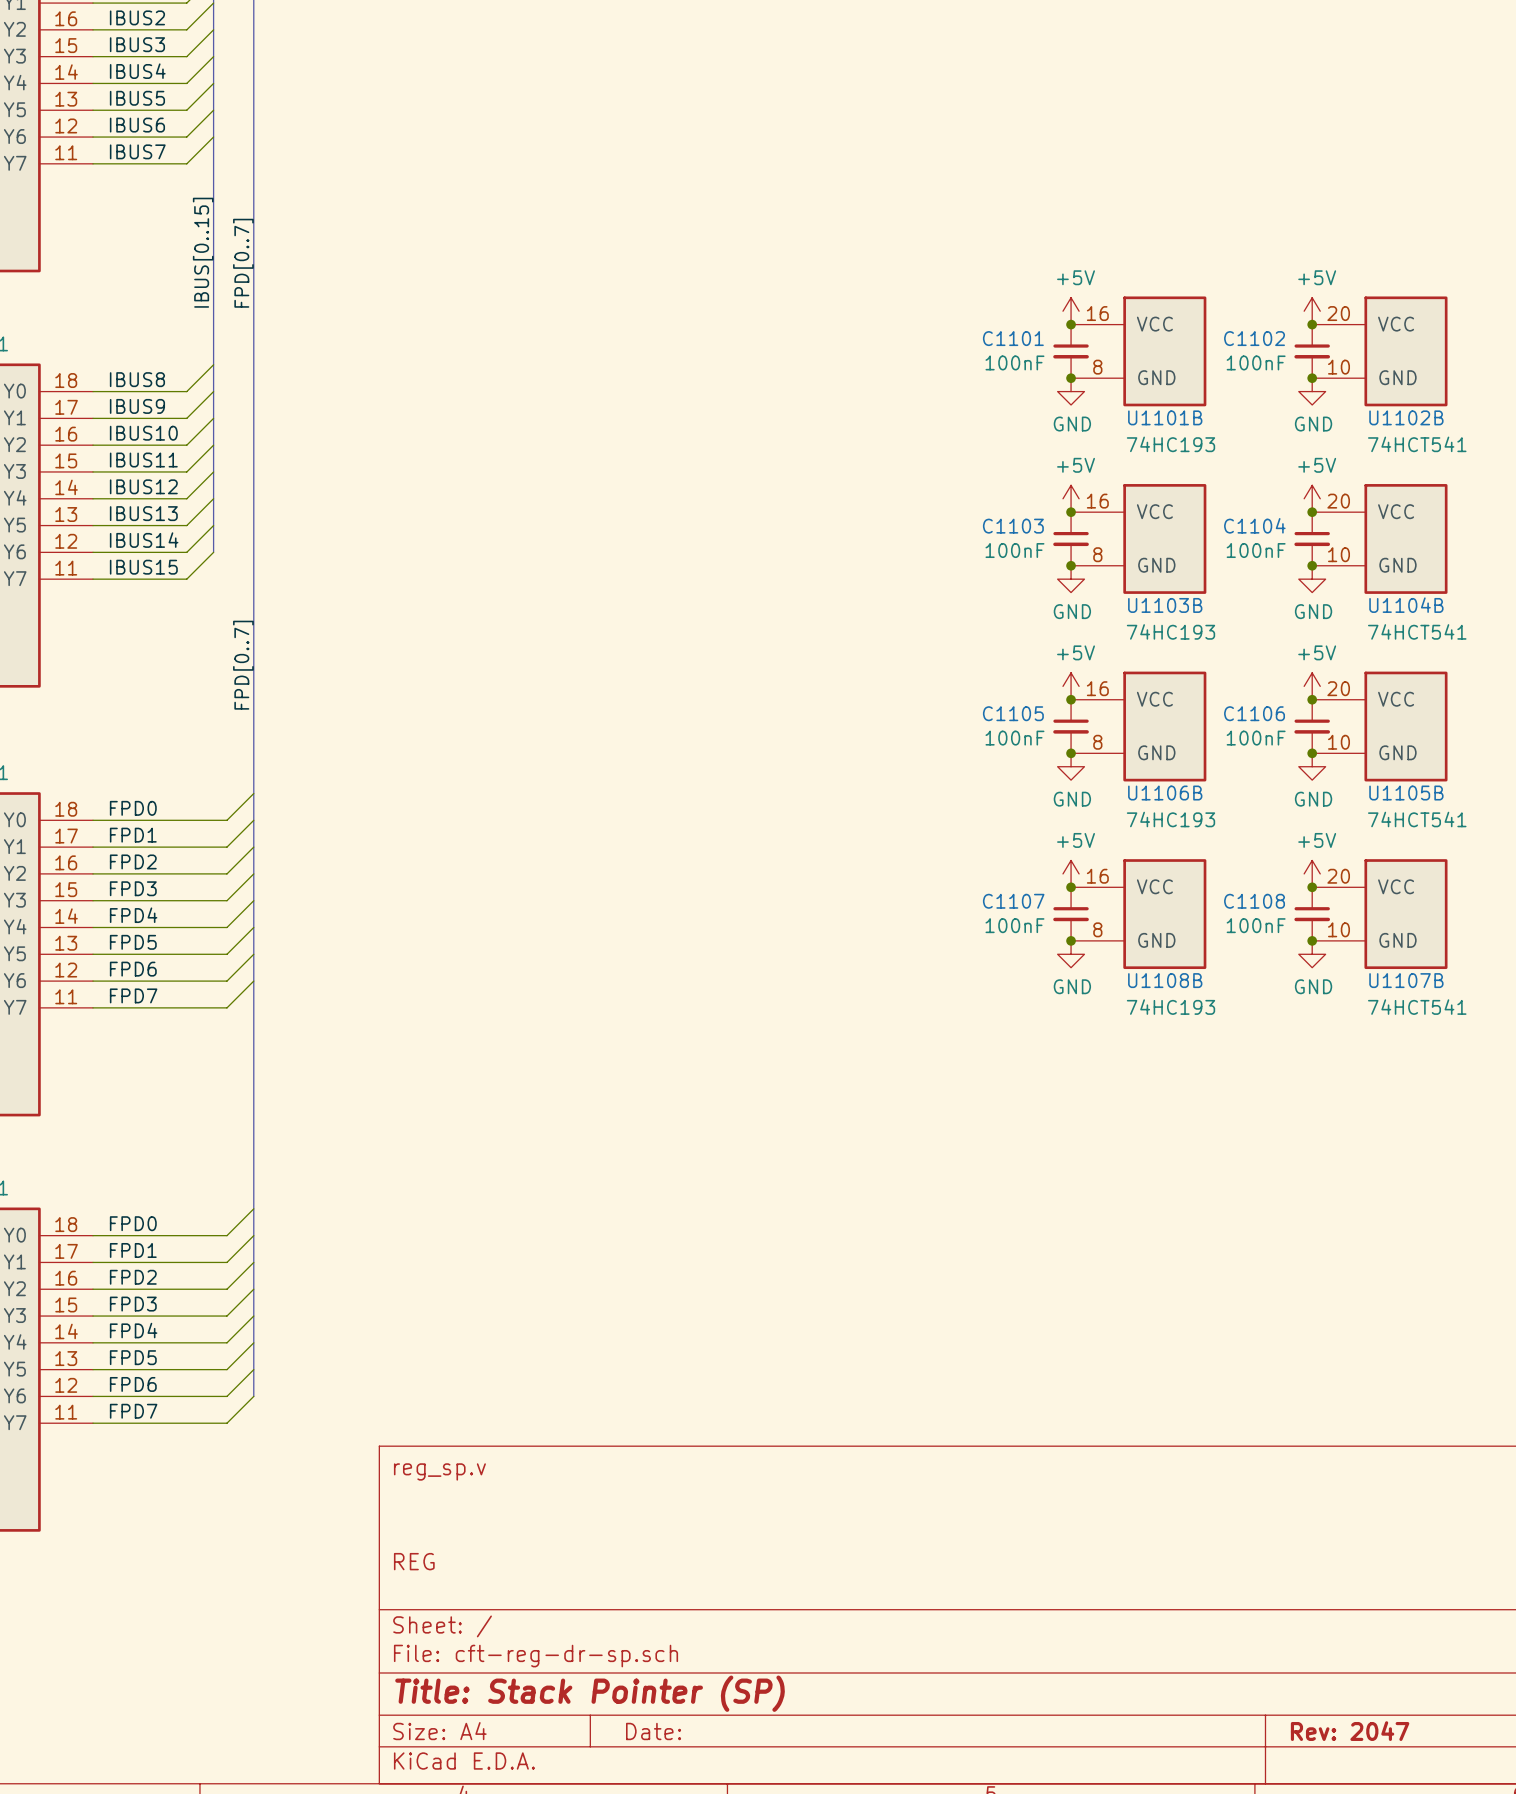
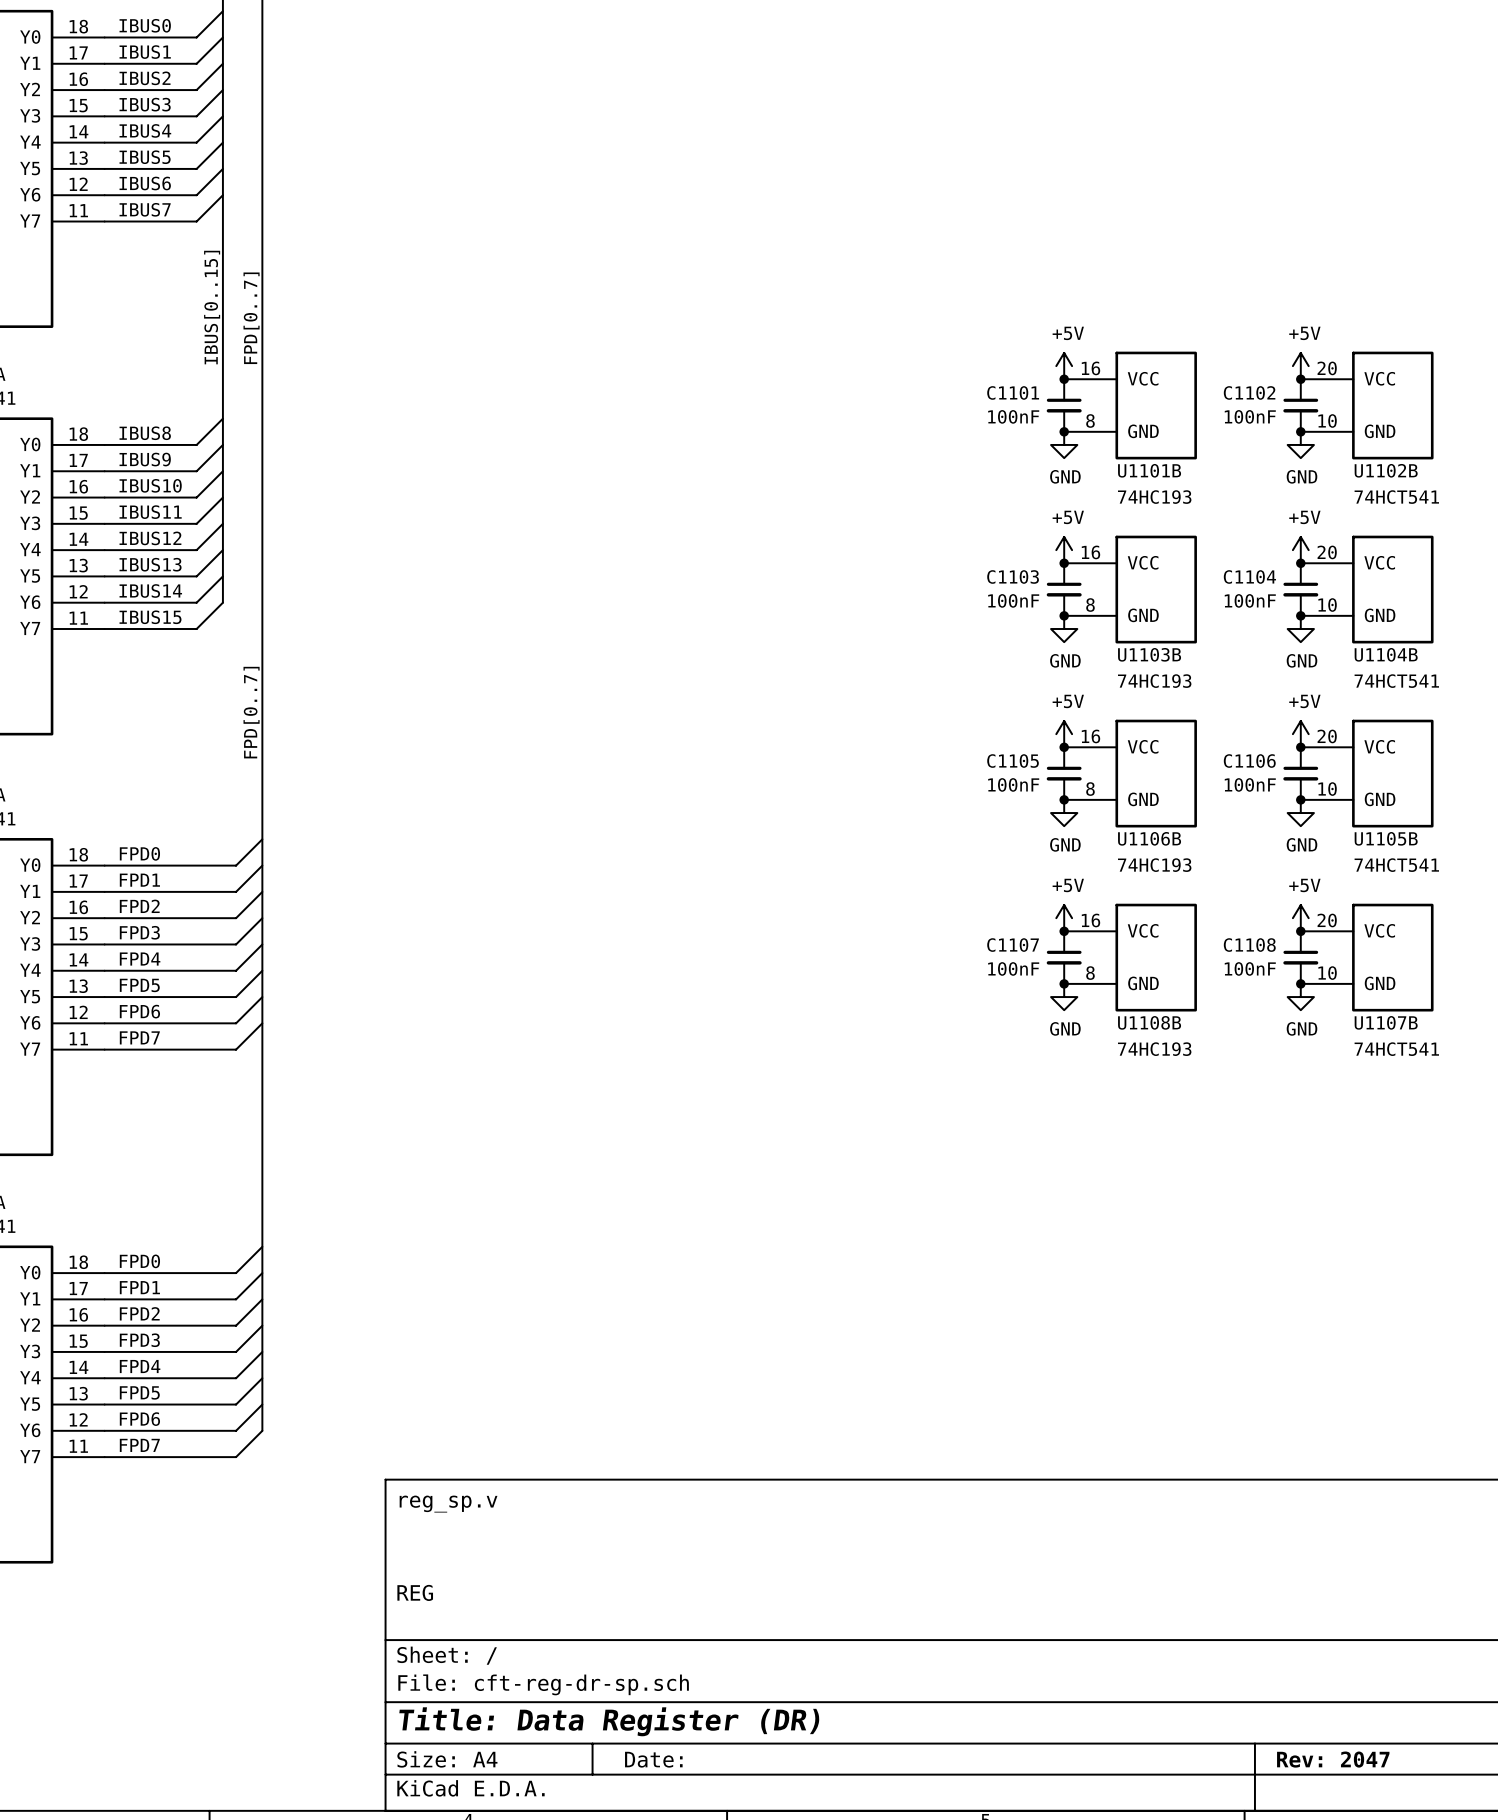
title block: Title: Stack Pointer (SP) (590, 1693) -> Title: Data Register (DR) (609, 1721)

